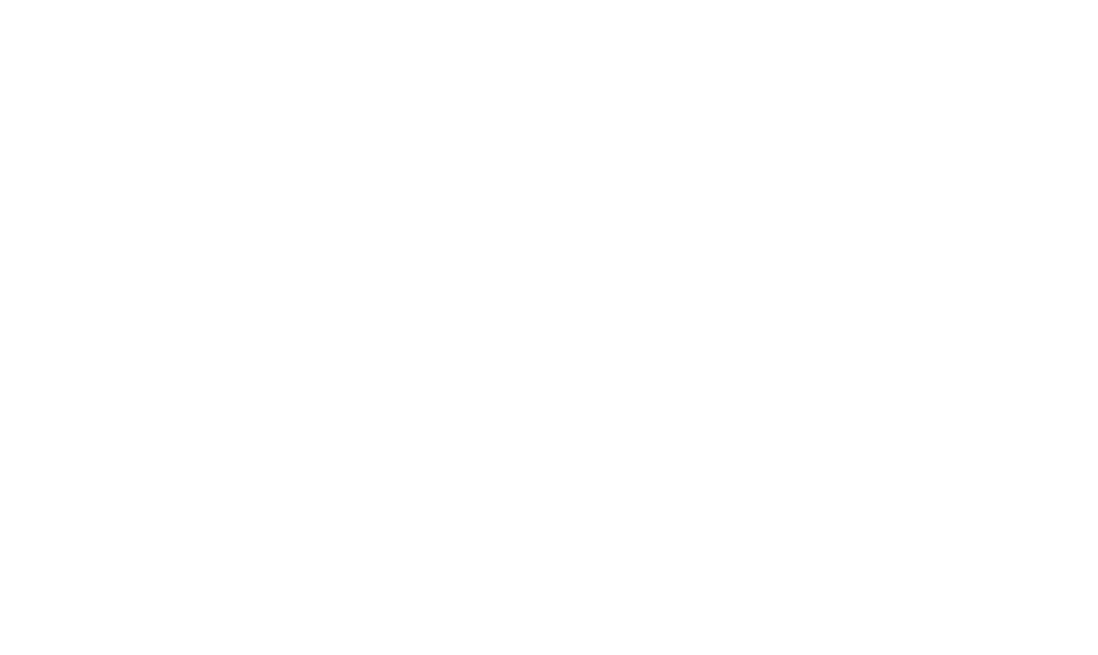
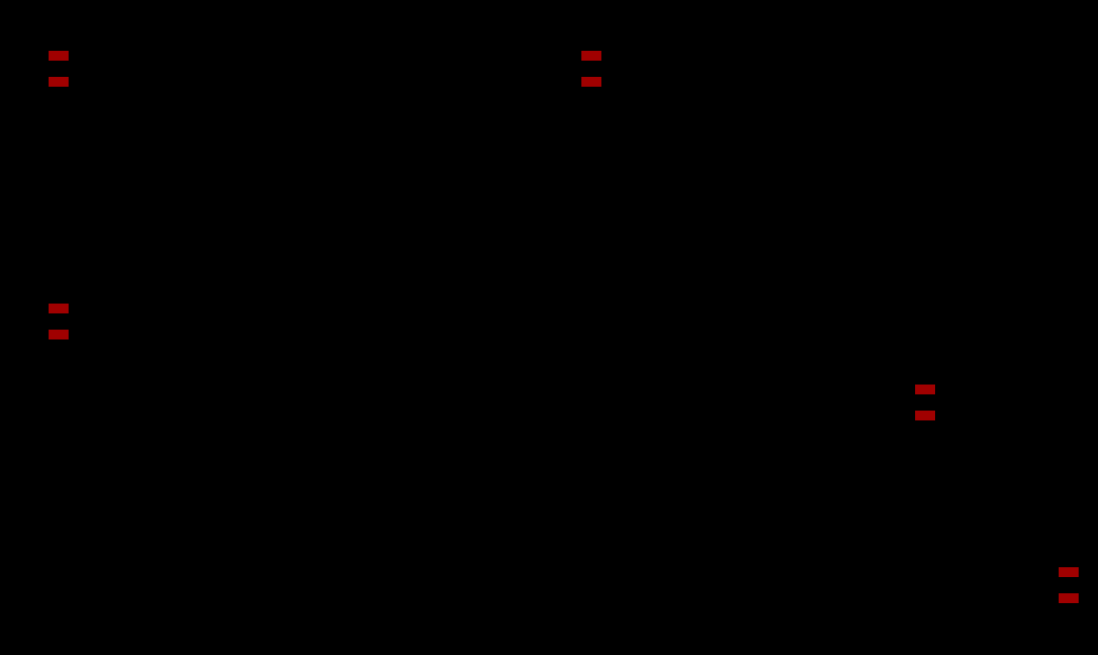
part: none -> (58, 68)
part: none -> (591, 68)
part: none -> (58, 321)
part: none -> (925, 402)
part: none -> (1068, 585)

